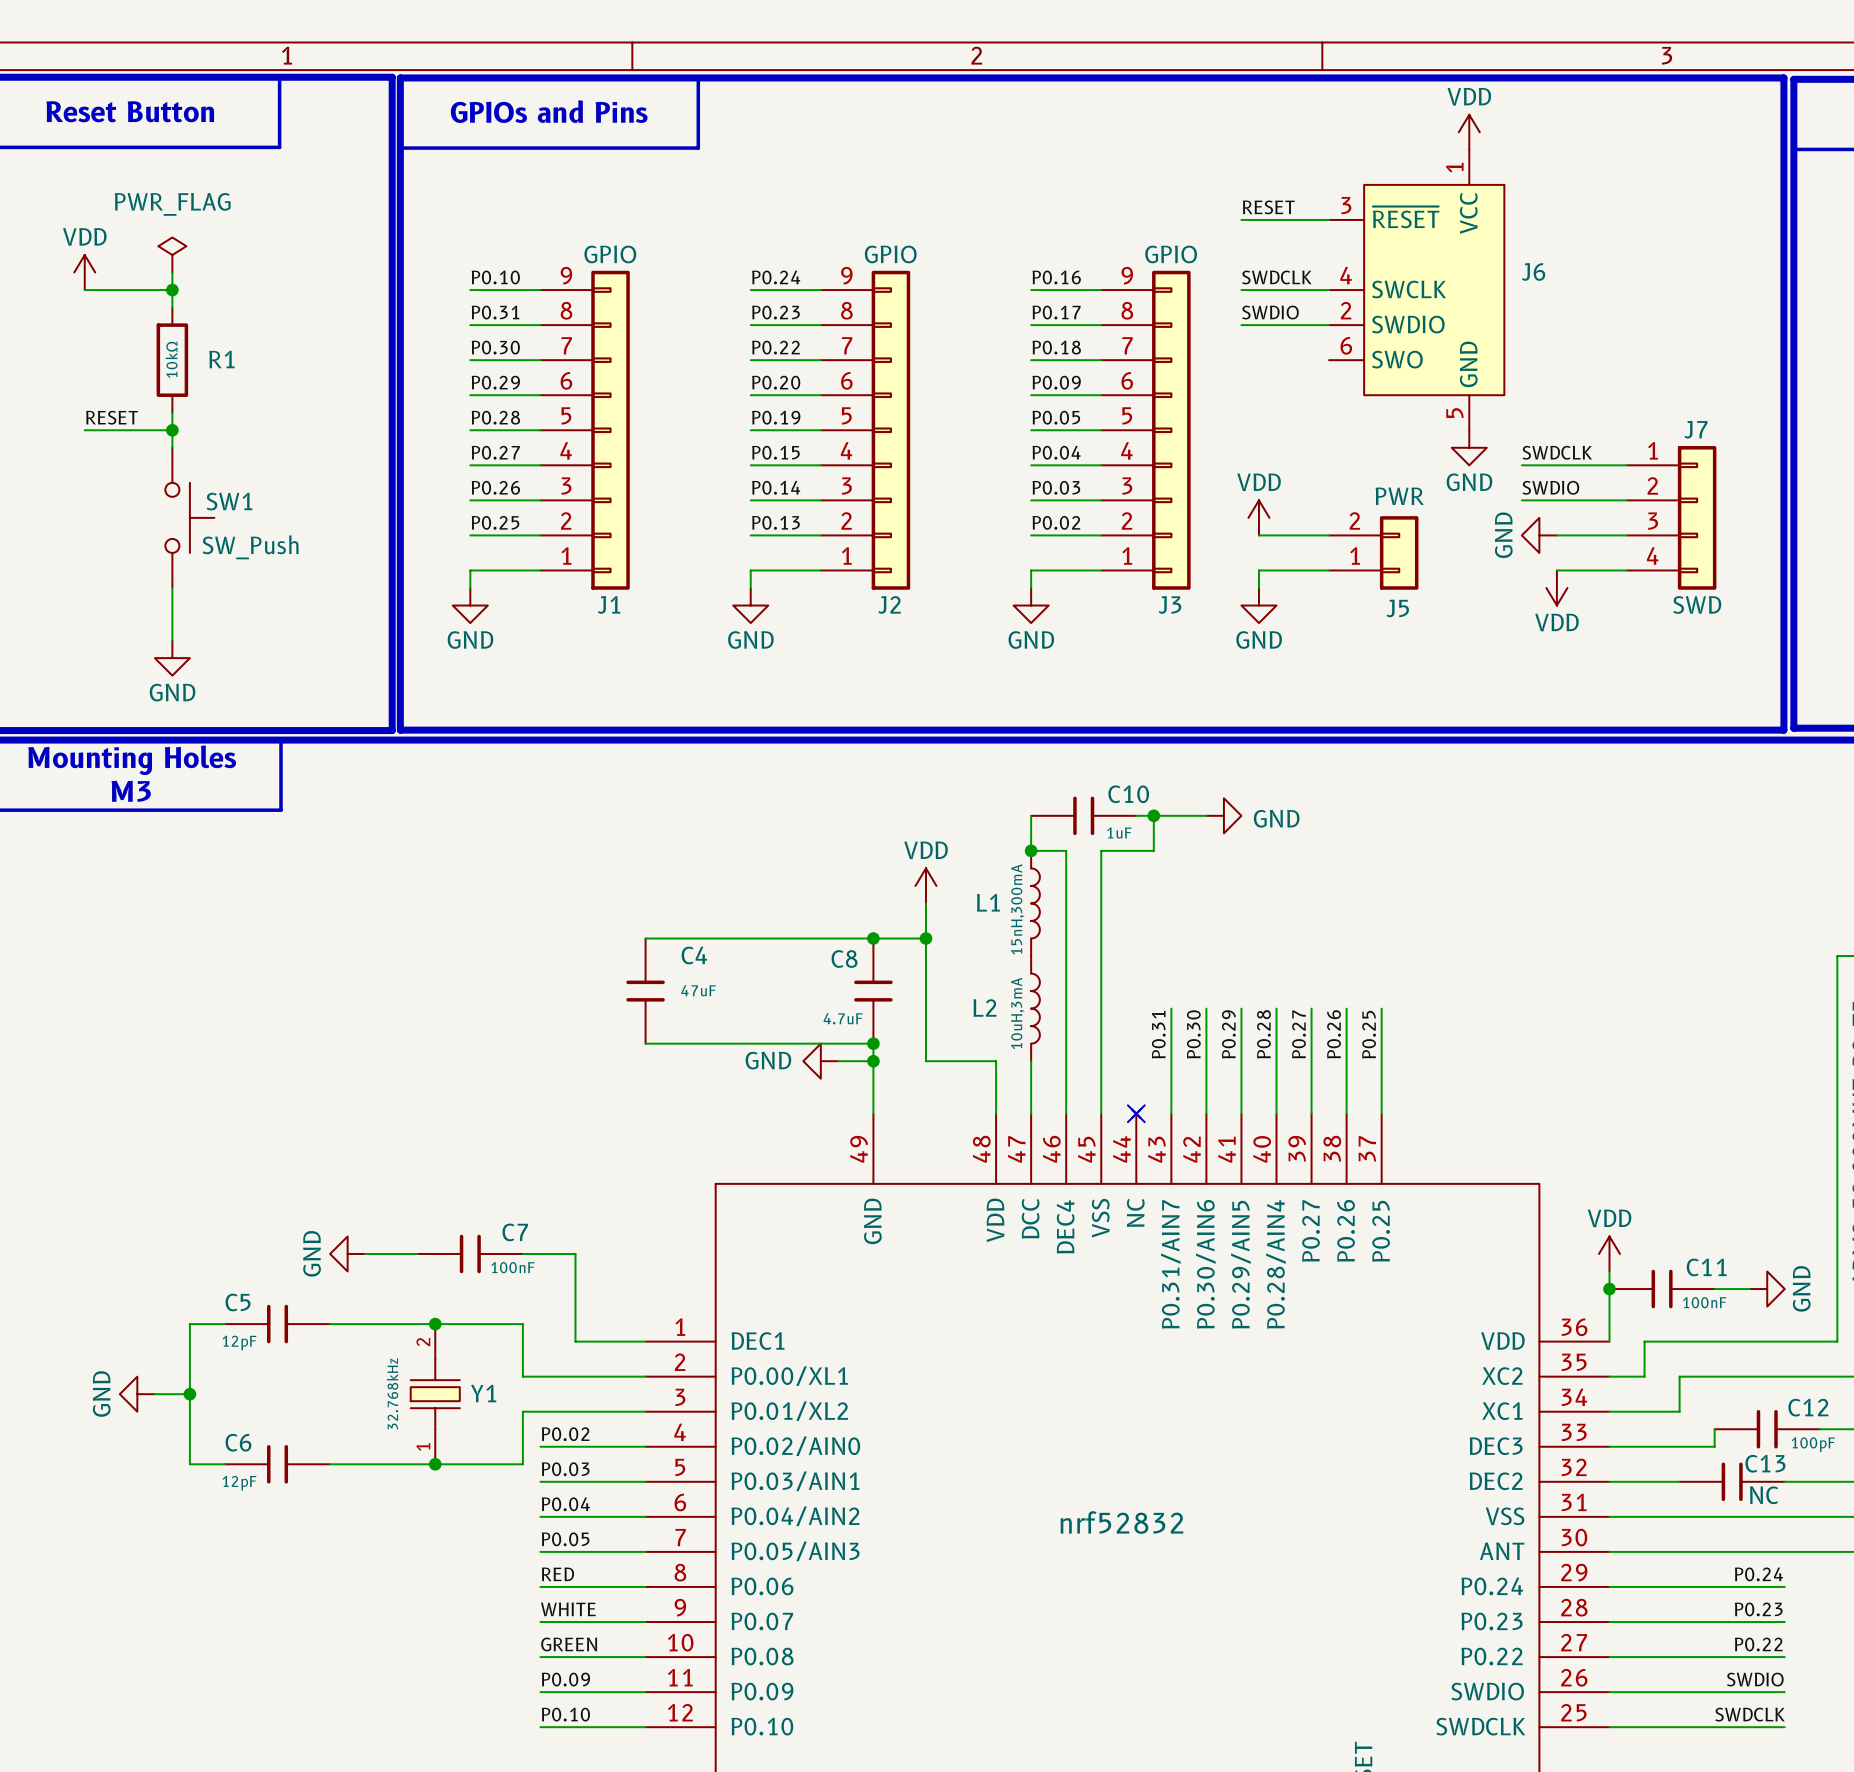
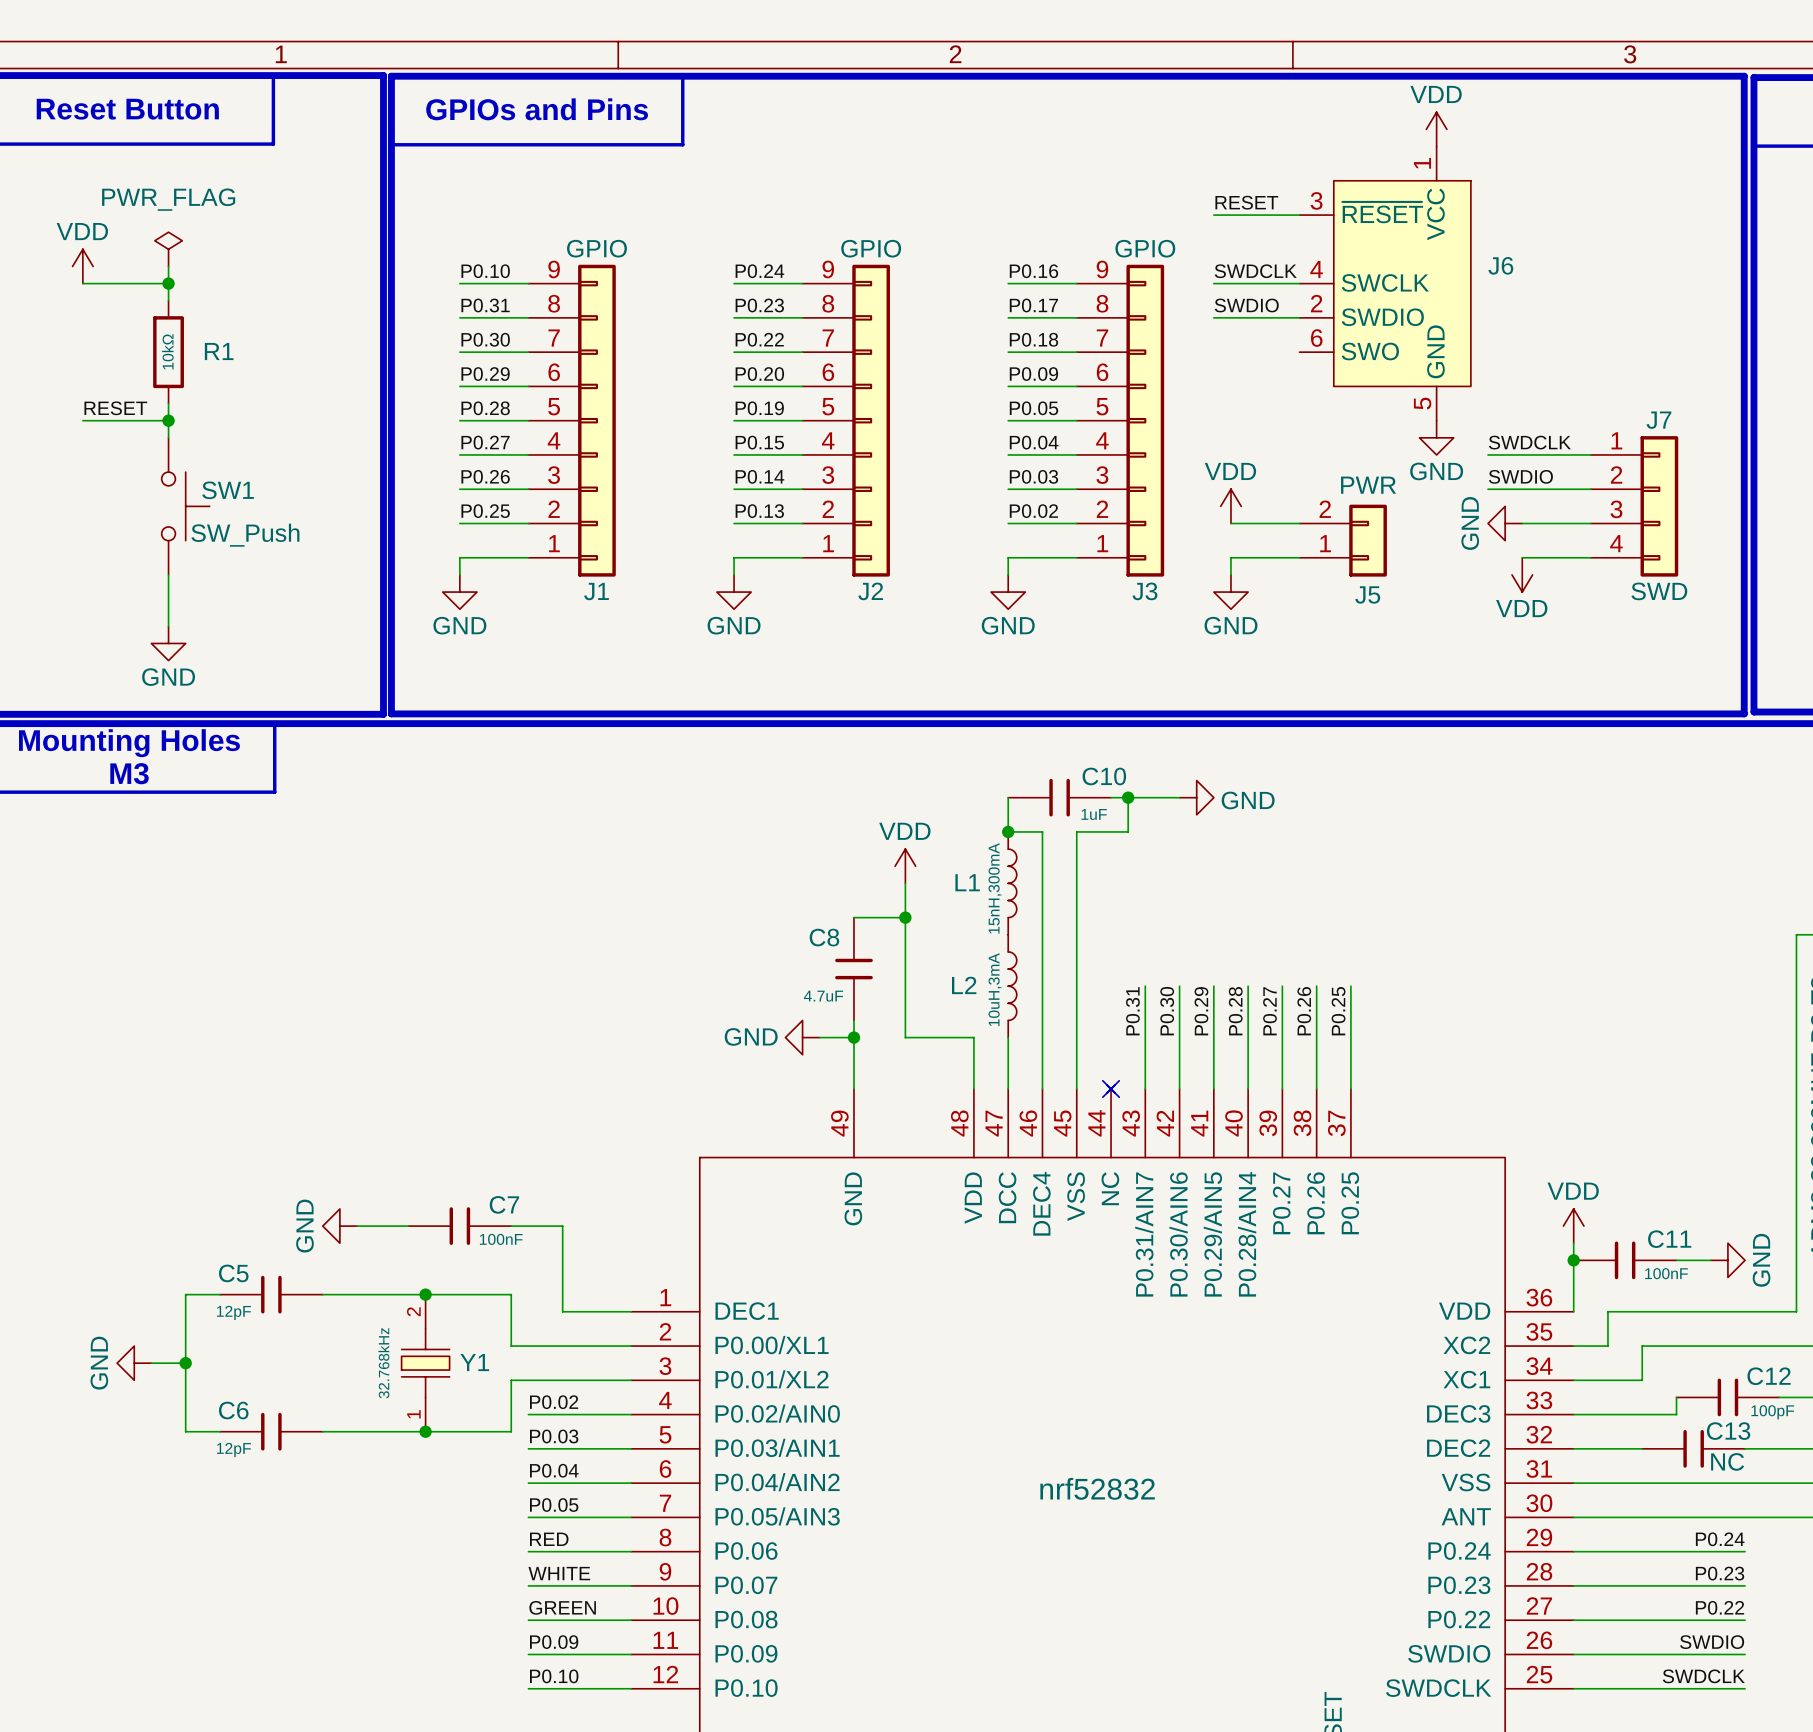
wire: (645, 938) (873, 938) -> none
junction: (873, 938) -> none
C4: 47uF (645, 991) -> none
wire: (645, 1043) (873, 1043) -> none
junction: (873, 1043) -> none

